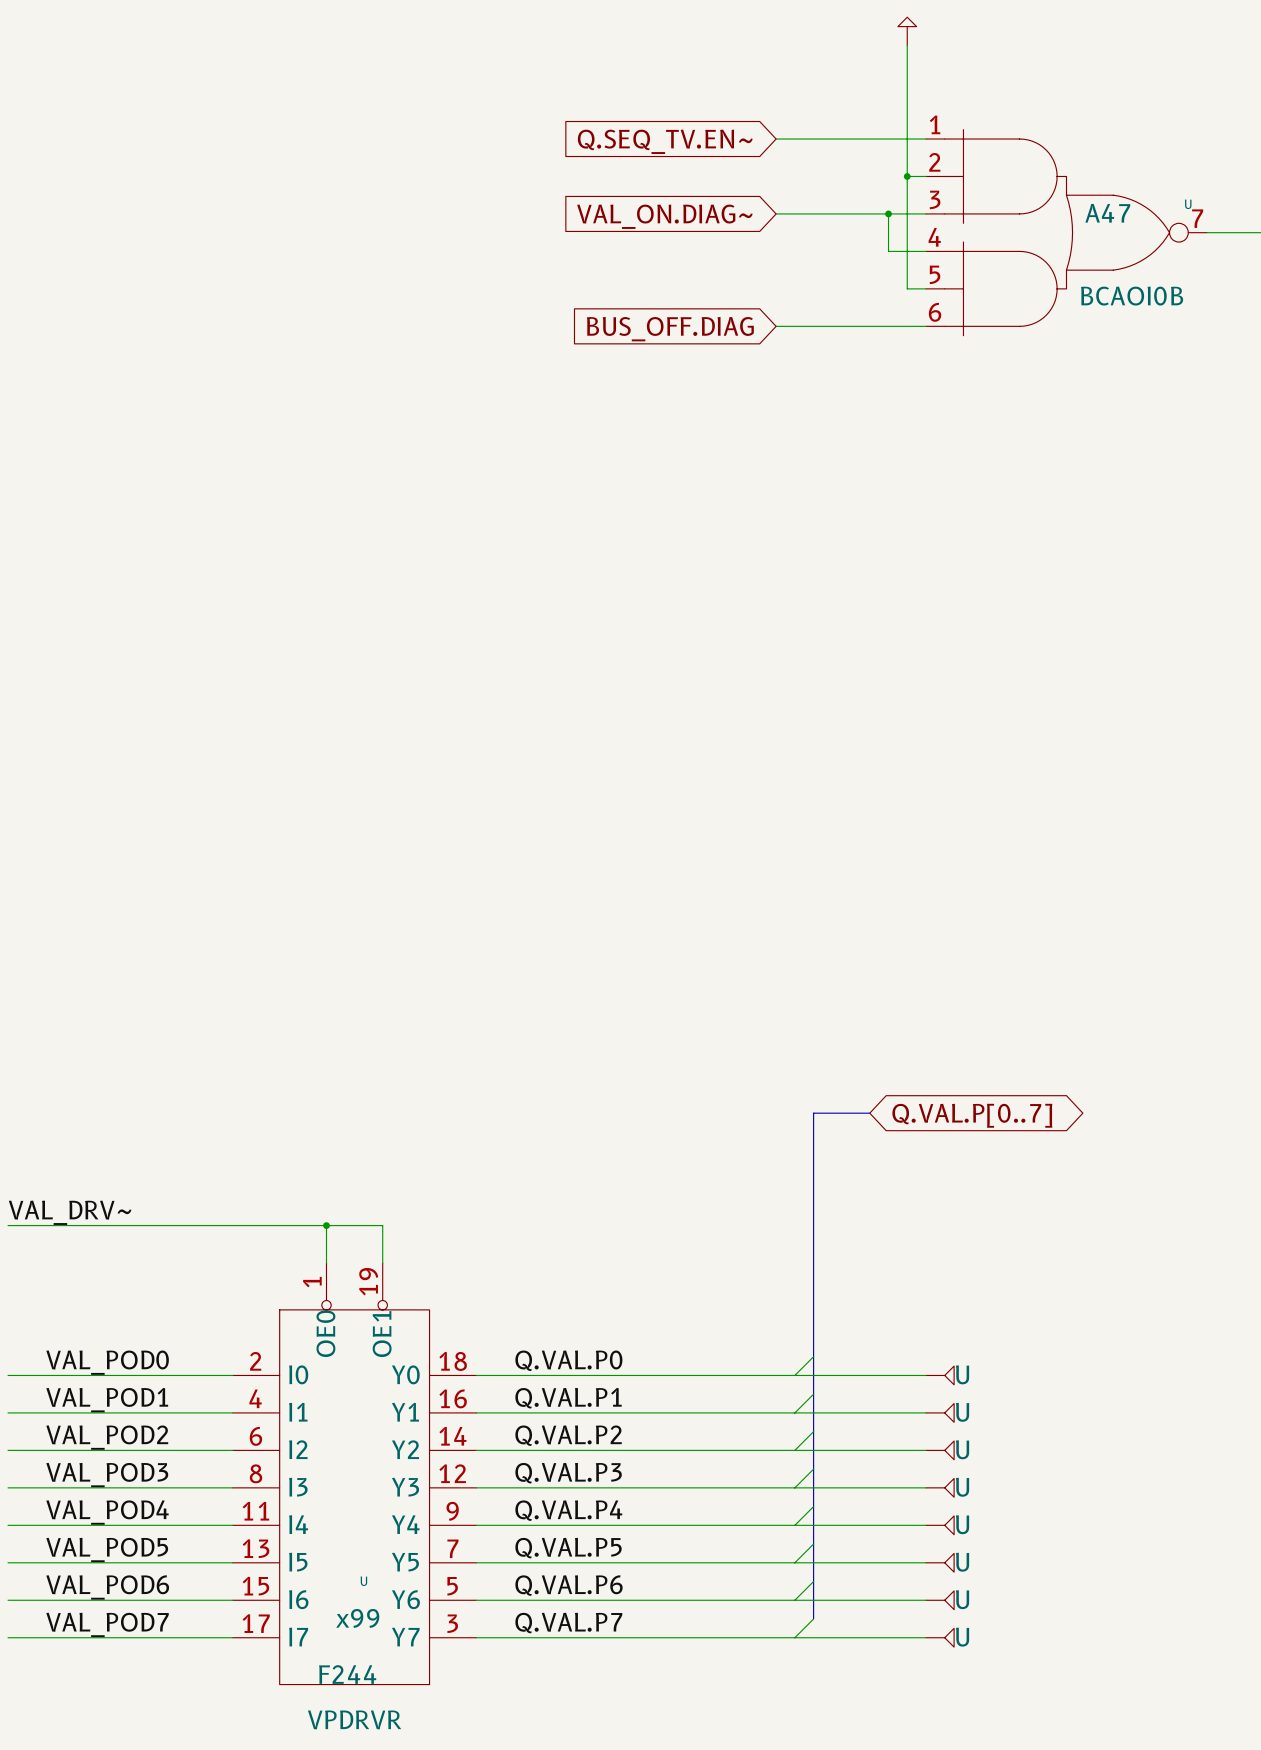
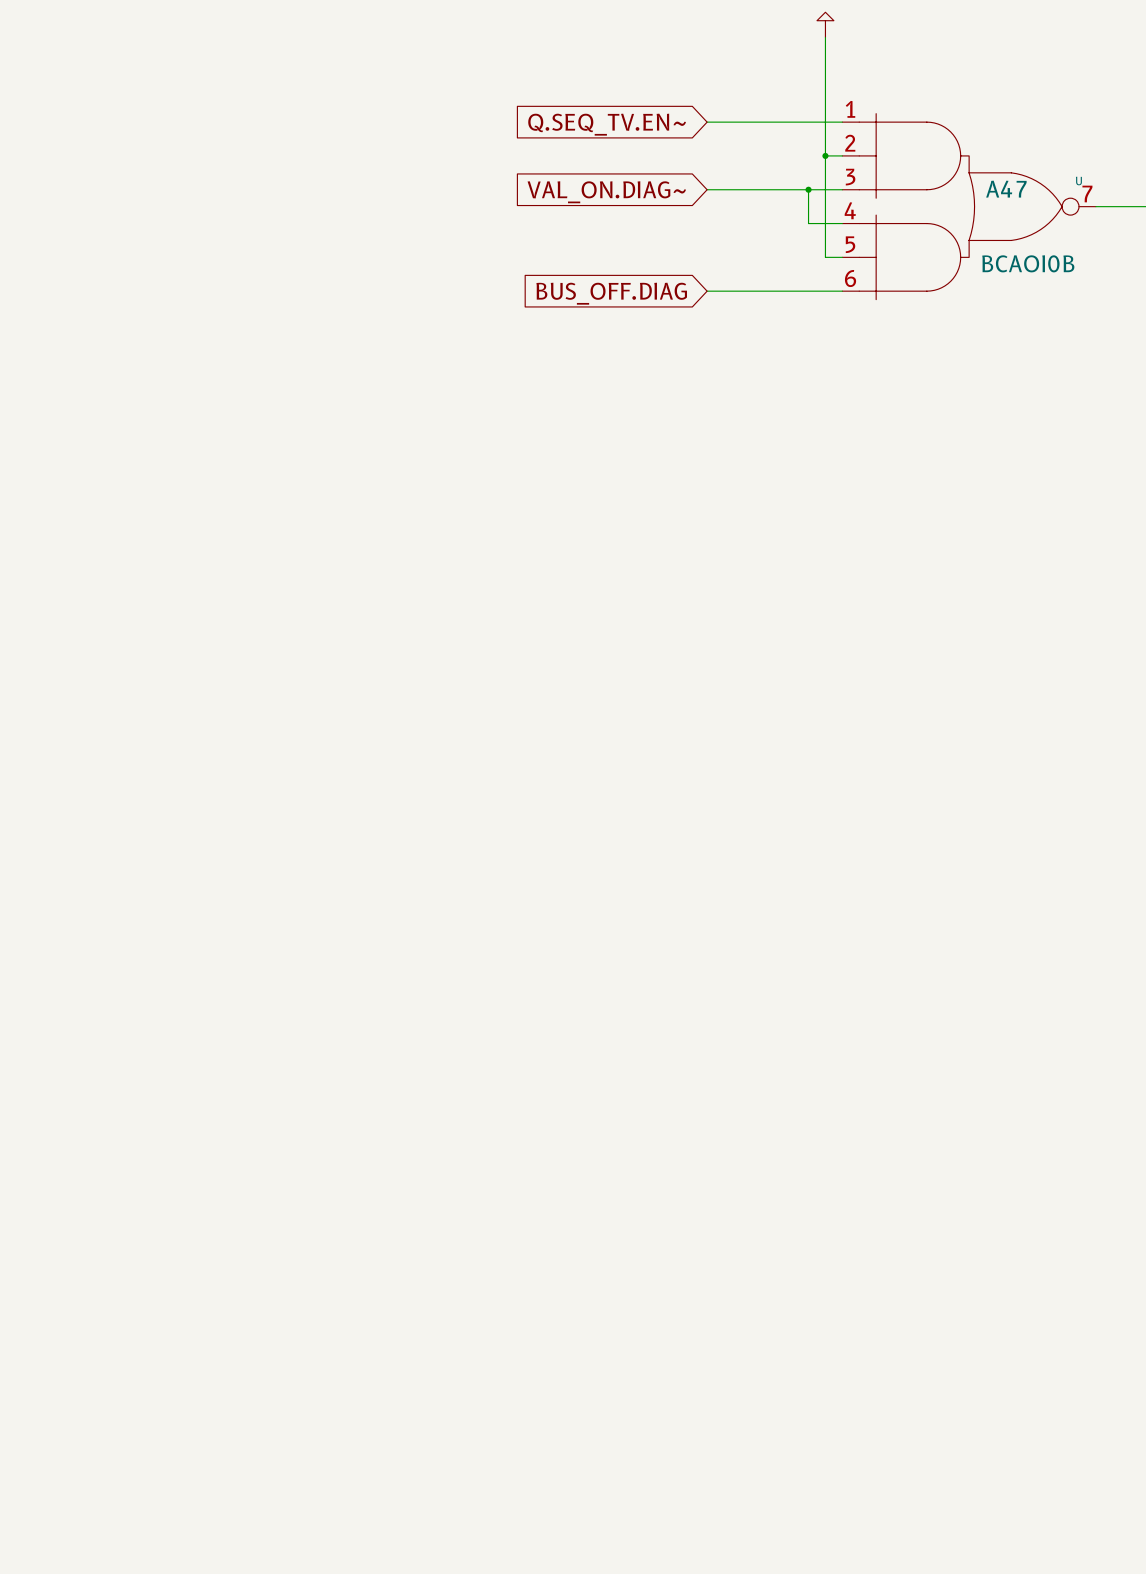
bus: (869, 1113) (813, 1113) (813, 1619) -> none
global label: Q.VAL.P[0..7] (972, 1115) -> none
label: VAL_DRV~ (70, 1212) -> none
wire: (8, 1225) (382, 1225) (382, 1263) -> none
wire: (326, 1225) (326, 1263) -> none
junction: (326, 1225) -> none
wire: (813, 1356) (794, 1375) -> none
label: Q.VAL.P0 (568, 1360) -> none
label: VAL_POD0 (107, 1362) -> none
wire: (8, 1375) (232, 1375) -> none
wire: (476, 1375) (925, 1375) -> none
U: (940, 1375) -> none
wire: (813, 1394) (794, 1412) -> none
label: Q.VAL.P1 (568, 1398) -> none
label: VAL_POD1 (107, 1400) -> none
wire: (8, 1412) (232, 1412) -> none
wire: (476, 1412) (925, 1412) -> none
U: (940, 1412) -> none
wire: (813, 1431) (794, 1450) -> none
label: Q.VAL.P2 (568, 1435) -> none
label: VAL_POD2 (107, 1437) -> none
wire: (8, 1450) (232, 1450) -> none
wire: (476, 1450) (925, 1450) -> none
U: (940, 1450) -> none
wire: (813, 1469) (794, 1487) -> none
U: F244 (354, 1473) -> none
label: Q.VAL.P3 (568, 1473) -> none
label: VAL_POD3 (107, 1475) -> none
wire: (8, 1487) (232, 1487) -> none
wire: (476, 1487) (925, 1487) -> none
U: (940, 1487) -> none
wire: (813, 1506) (794, 1525) -> none
label: Q.VAL.P4 (568, 1510) -> none
label: VAL_POD4 (107, 1512) -> none
wire: (8, 1525) (232, 1525) -> none
wire: (476, 1525) (925, 1525) -> none
U: (940, 1525) -> none
wire: (813, 1544) (794, 1562) -> none
label: Q.VAL.P5 (568, 1548) -> none
label: VAL_POD5 (107, 1550) -> none
wire: (8, 1562) (232, 1562) -> none
wire: (476, 1562) (925, 1562) -> none
U: (940, 1562) -> none
wire: (813, 1581) (794, 1600) -> none
label: Q.VAL.P6 (569, 1585) -> none
label: VAL_POD6 (107, 1587) -> none
wire: (8, 1600) (232, 1600) -> none
wire: (476, 1600) (925, 1600) -> none
U: (940, 1600) -> none
wire: (813, 1619) (794, 1637) -> none
label: Q.VAL.P7 (568, 1623) -> none
label: VAL_POD7 (107, 1624) -> none
wire: (8, 1637) (232, 1637) -> none
wire: (476, 1637) (925, 1637) -> none
U: (940, 1637) -> none

